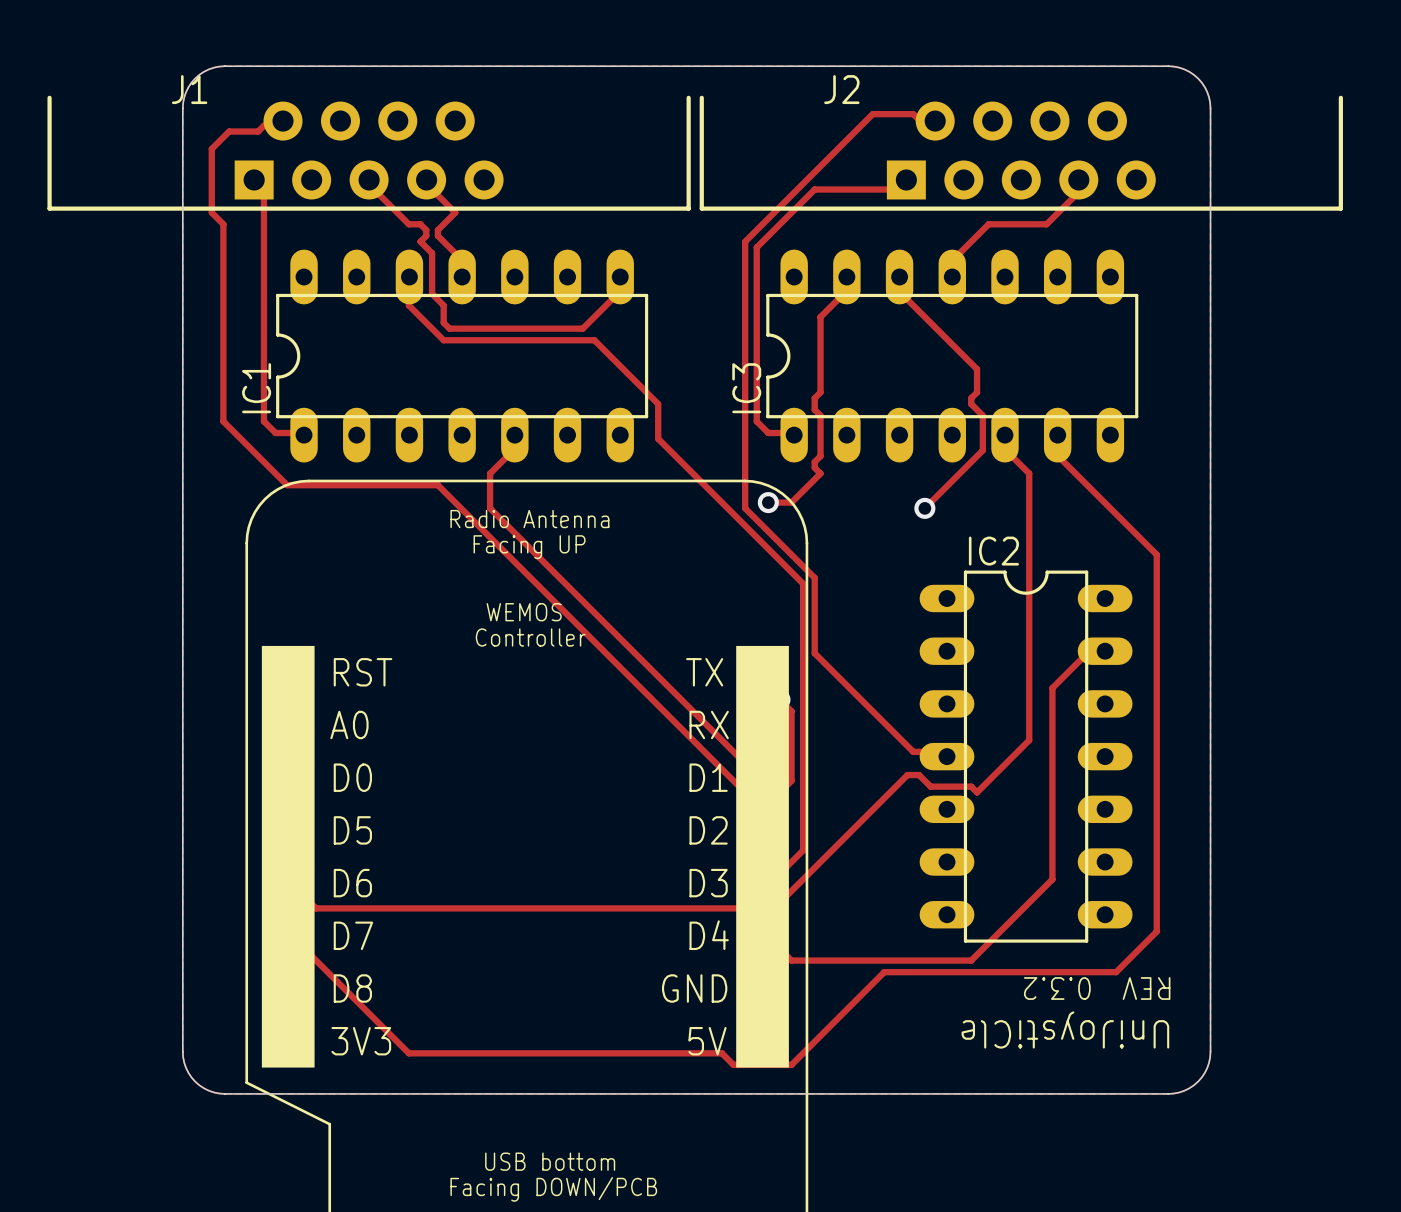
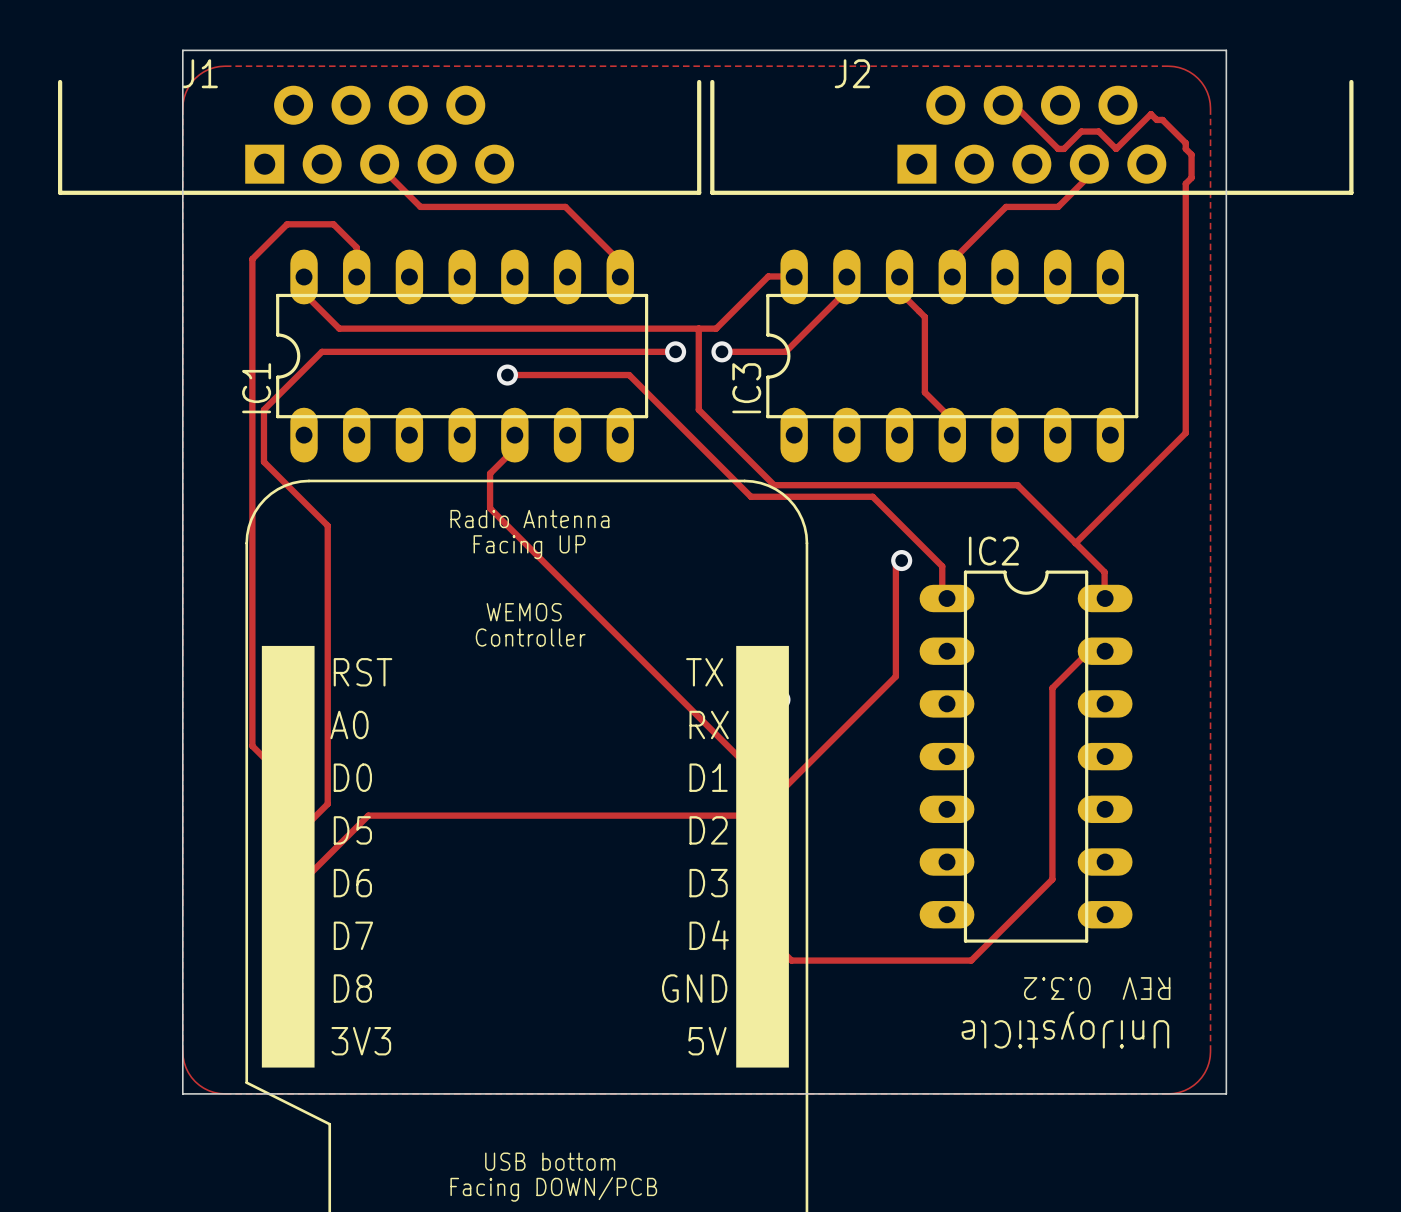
track: none -> (1003, 105) (1006, 108) (1017, 108) (1058, 148) (1064, 148) (1081, 131) (1098, 131) (1116, 148) (1150, 114) (1156, 119) (1162, 119) (1185, 143) (1185, 148) (1191, 154) (1191, 177) (1185, 183) (1185, 433) (1075, 543)
board edge: (182, 108) (186, 92) (195, 78) (208, 69) (224, 66) (1168, 66) (1184, 69) (1198, 78) (1207, 92) (1210, 108) (1210, 1051) (1207, 1067) (1198, 1081) (1184, 1090) (1168, 1093) -> (182, 108) (182, 50) (1226, 50) (1226, 1093) (1168, 1093)
track: (283, 121) (281, 125) (263, 125) (258, 131) (229, 131) (211, 148) (211, 212) (223, 224) (223, 421) (263, 461) -> none
track: (935, 121) (919, 119) (913, 114) (872, 114) (745, 241) (745, 508) (814, 577) (814, 653) (913, 751) (942, 751) (947, 756) -> none
J1 position: (369, 153) -> (379, 137)
J2 position: (1021, 153) -> (1031, 137)
track: none -> (379, 164) (420, 206) (565, 206) (617, 259) (617, 276) (620, 277)
track: (254, 179) (263, 189) (263, 409) -> (675, 351) (321, 351) (263, 409)
track: (369, 179) (368, 183) (408, 224) (420, 224) (426, 230) (426, 235) (420, 241) (432, 253) (432, 293) (443, 305) (443, 322) (449, 328) -> (304, 277) (304, 293) (339, 328) (449, 328)
track: (426, 179) (426, 183) (455, 212) (437, 230) (437, 235) (461, 259) (462, 277) -> none
track: (906, 179) (895, 189) (814, 189) (756, 247) (756, 421) (768, 433) (791, 433) (794, 435) -> none
track: (1078, 179) (1075, 183) (1075, 195) (1046, 224) (988, 224) -> (1089, 164) (1087, 166) (1087, 177) (1058, 206) (1006, 206) (988, 224)
track: none -> (356, 277) (356, 247) (333, 224) (287, 224) (252, 259) (252, 746) (281, 775) (287, 775) (288, 777)
track: (409, 277) (408, 305) (443, 340) (594, 340) (629, 375) -> (507, 375) (629, 375)
track: (620, 277) (617, 282) (617, 293) (582, 328) -> (794, 277) (768, 276) (716, 328) (582, 328)
track: (820, 317) (820, 392) (814, 398) (814, 409) (820, 415) (820, 456) (814, 461) (814, 467) (820, 473) (791, 502) (768, 502) -> (820, 317) (785, 351) (721, 351)
track: (924, 317) (977, 369) (977, 392) (971, 398) (971, 404) (982, 415) (982, 450) (924, 508) -> (924, 317) (924, 392) (948, 415) (948, 433) (952, 435)
track: none -> (698, 328) (698, 409) (774, 485) (1017, 485) (1104, 572) (1105, 598)
via: none -> (675, 351)
via: none -> (721, 351)
via: none -> (507, 375)
track: (658, 404) (658, 438) (803, 583) (803, 850) (774, 879) (762, 879) (762, 883) -> (658, 404) (750, 496) (872, 496) (942, 566) (942, 595) (947, 598)
track: (263, 421) (275, 433) (298, 433) (304, 435) -> (263, 421) (263, 461)
track: (1004, 435) (1006, 450) (1029, 473) (1029, 740) (977, 792) (971, 786) (930, 786) (919, 775) (907, 775) (774, 908) (316, 908) (292, 885) (288, 883) -> none
track: (1057, 435) (1058, 456) (1156, 554) (1156, 931) (1116, 972) (884, 972) (791, 1064) (733, 1064) (721, 1053) (408, 1053) (292, 937) (288, 935) -> none
track: (287, 485) (437, 485) (756, 804) -> (288, 883) (292, 879) (304, 879) (368, 815) (745, 815) (756, 804)
track: none -> (287, 485) (327, 525) (327, 804) (304, 827) (292, 827) (288, 830)
via: (768, 502) -> none
via position: (924, 508) -> (901, 560)
track: (779, 699) (791, 711) (791, 780) -> (901, 560) (895, 566) (895, 676) (791, 780)
board edge: (182, 1051) (186, 1067) (195, 1081) (208, 1090) (224, 1093) -> (182, 1051) (182, 1093) (224, 1093)

